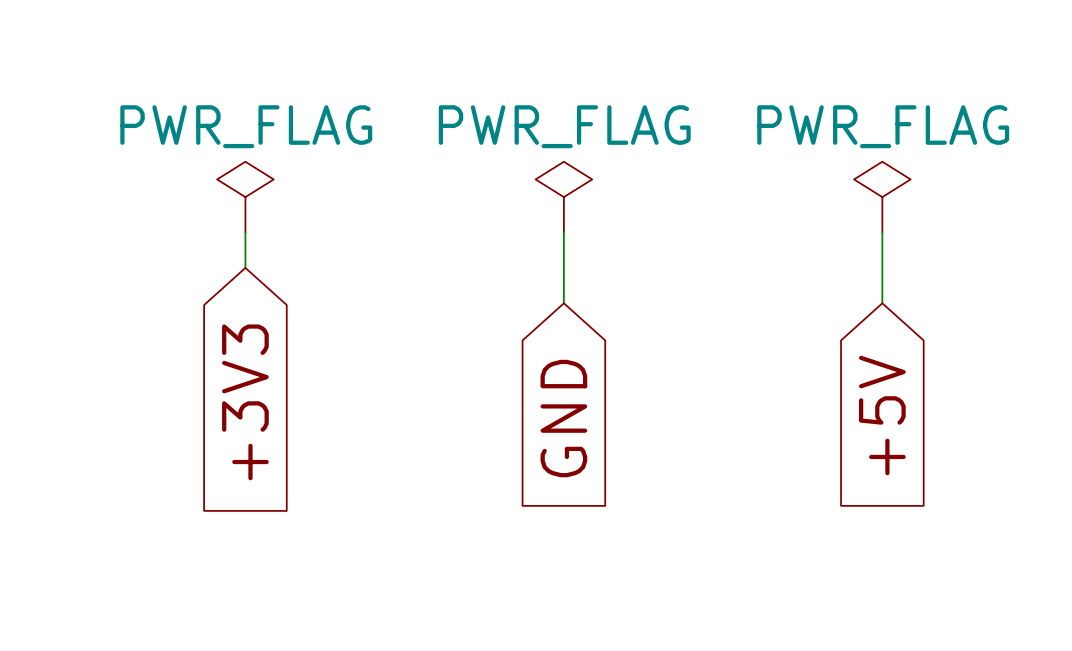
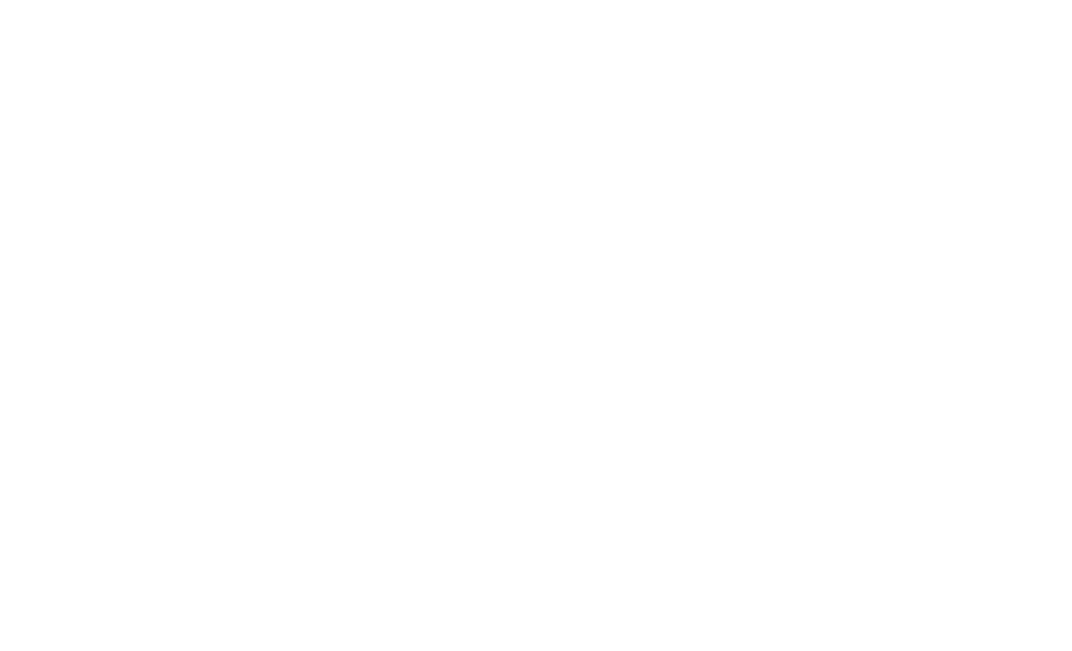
power symbol: PWR_FLAG (245, 197) -> none
power symbol: PWR_FLAG (563, 197) -> none
power symbol: PWR_FLAG (882, 197) -> none
wire: (245, 232) (245, 267) -> none
wire: (563, 232) (563, 303) -> none
wire: (882, 232) (882, 303) -> none
global label: +3V3 (245, 402) -> none
global label: +5V (882, 415) -> none
global label: GND (563, 418) -> none

